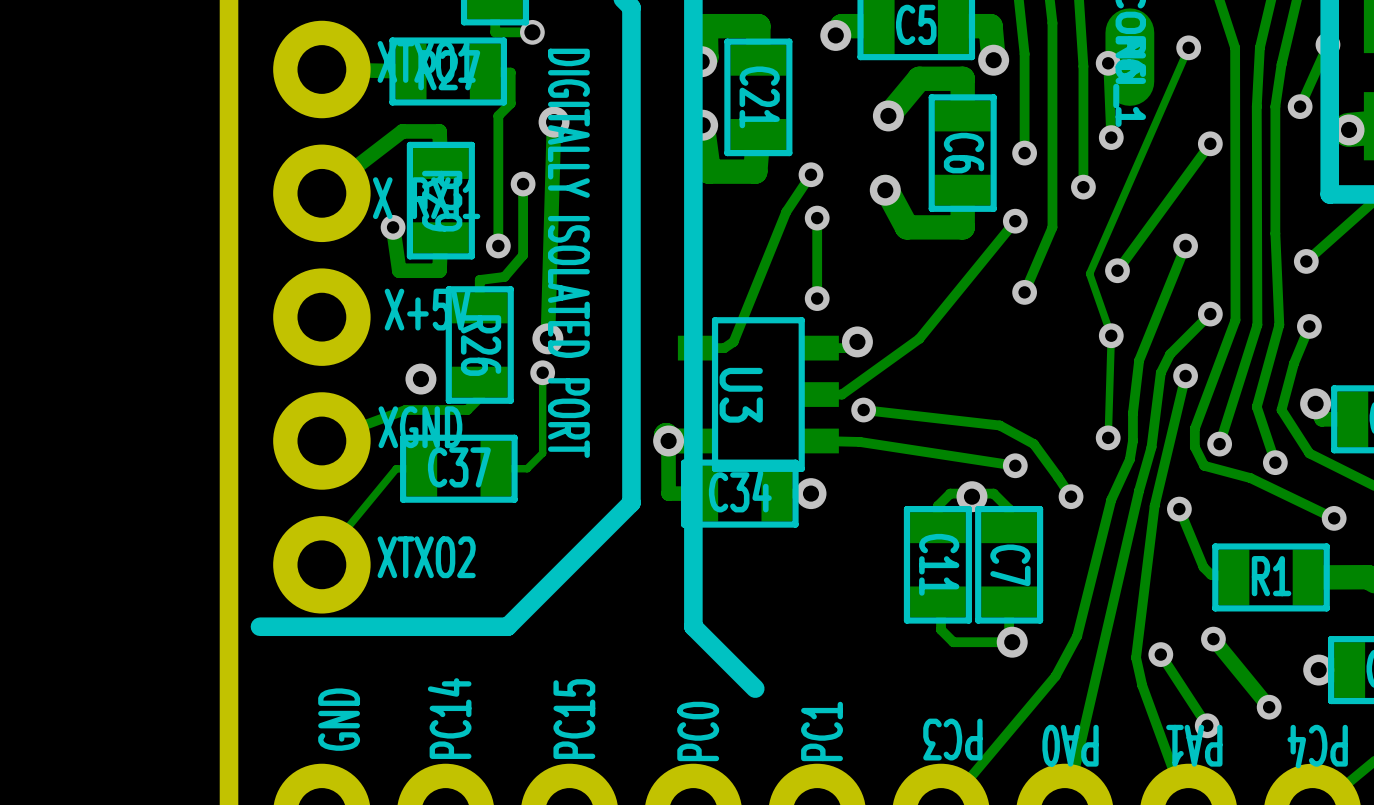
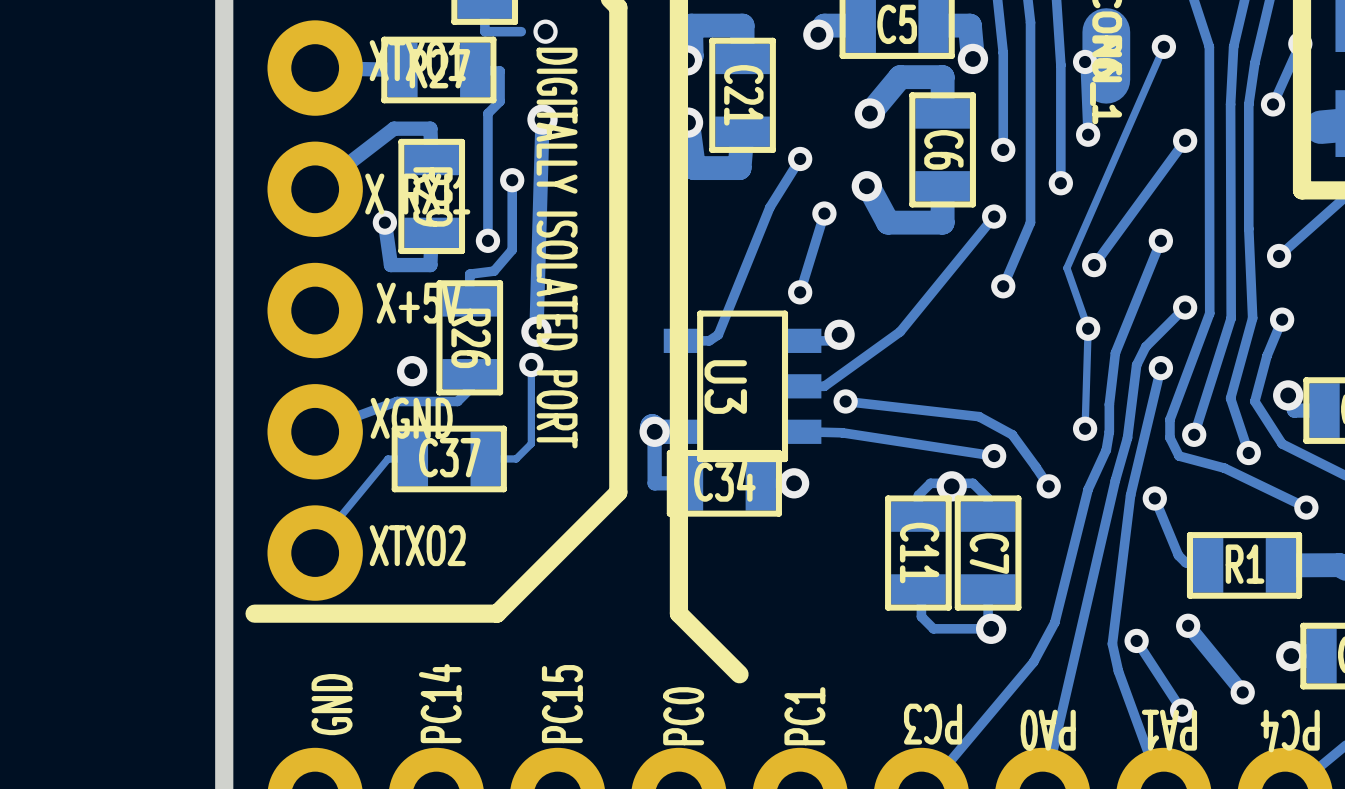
via position: (532, 32) -> (545, 31)
via: (1349, 129) -> none
track: (811, 174) (786, 211) -> (800, 158) (769, 207)
via position: (811, 174) -> (800, 158)
track: (817, 218) (817, 298) -> (824, 213) (800, 292)
via position: (817, 218) -> (824, 213)

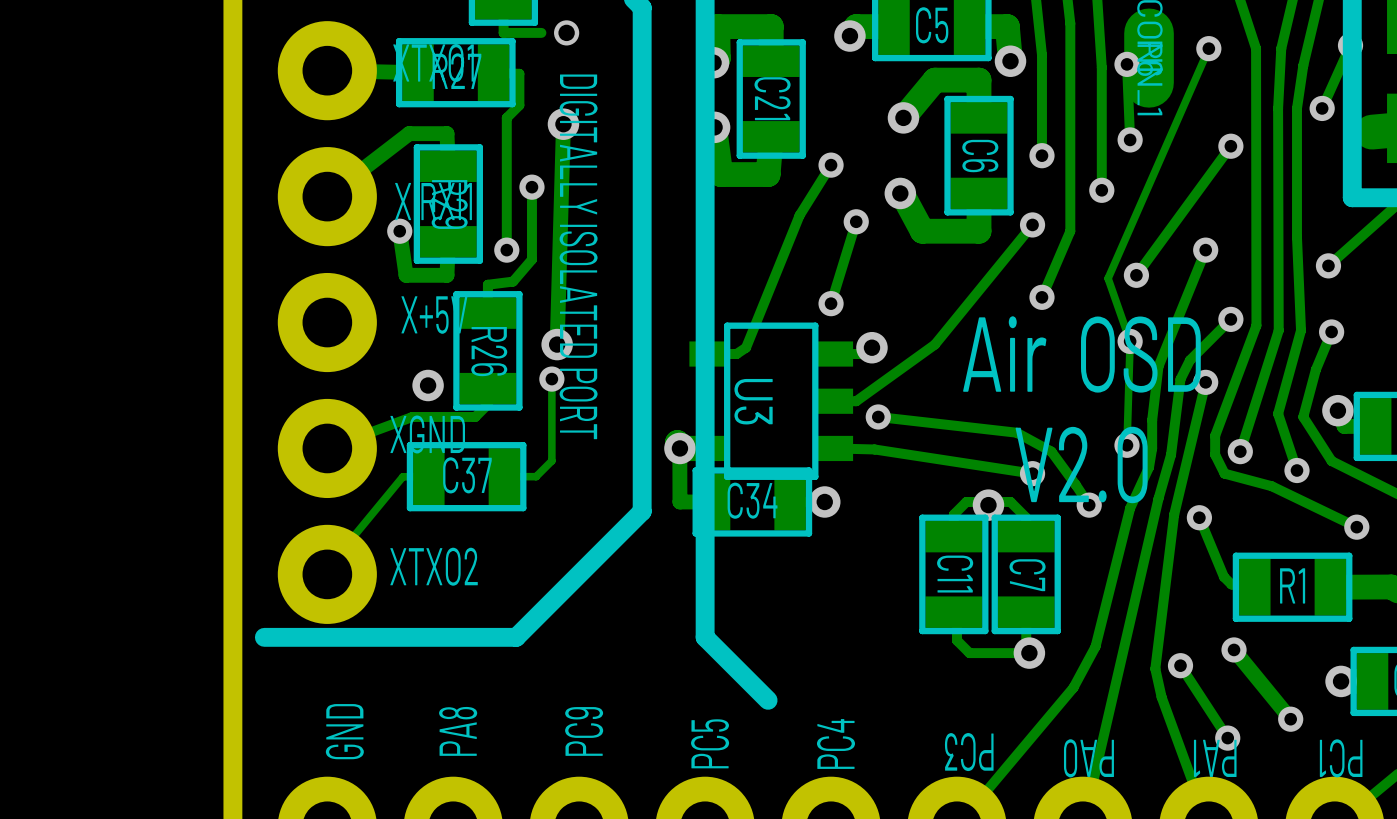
text: none -> Air OSD (1081, 354)
text: none -> V2.0 (1081, 464)
text: PC14 (440, 703) -> PA8 (458, 731)
text: PC15 (562, 704) -> PC9 (584, 731)
text: PC0 (683, 716) -> PC5 (710, 743)
text: PC1 (804, 716) -> PC4 (835, 743)
text: PC4 (1290, 731) -> PC1 (1341, 758)

